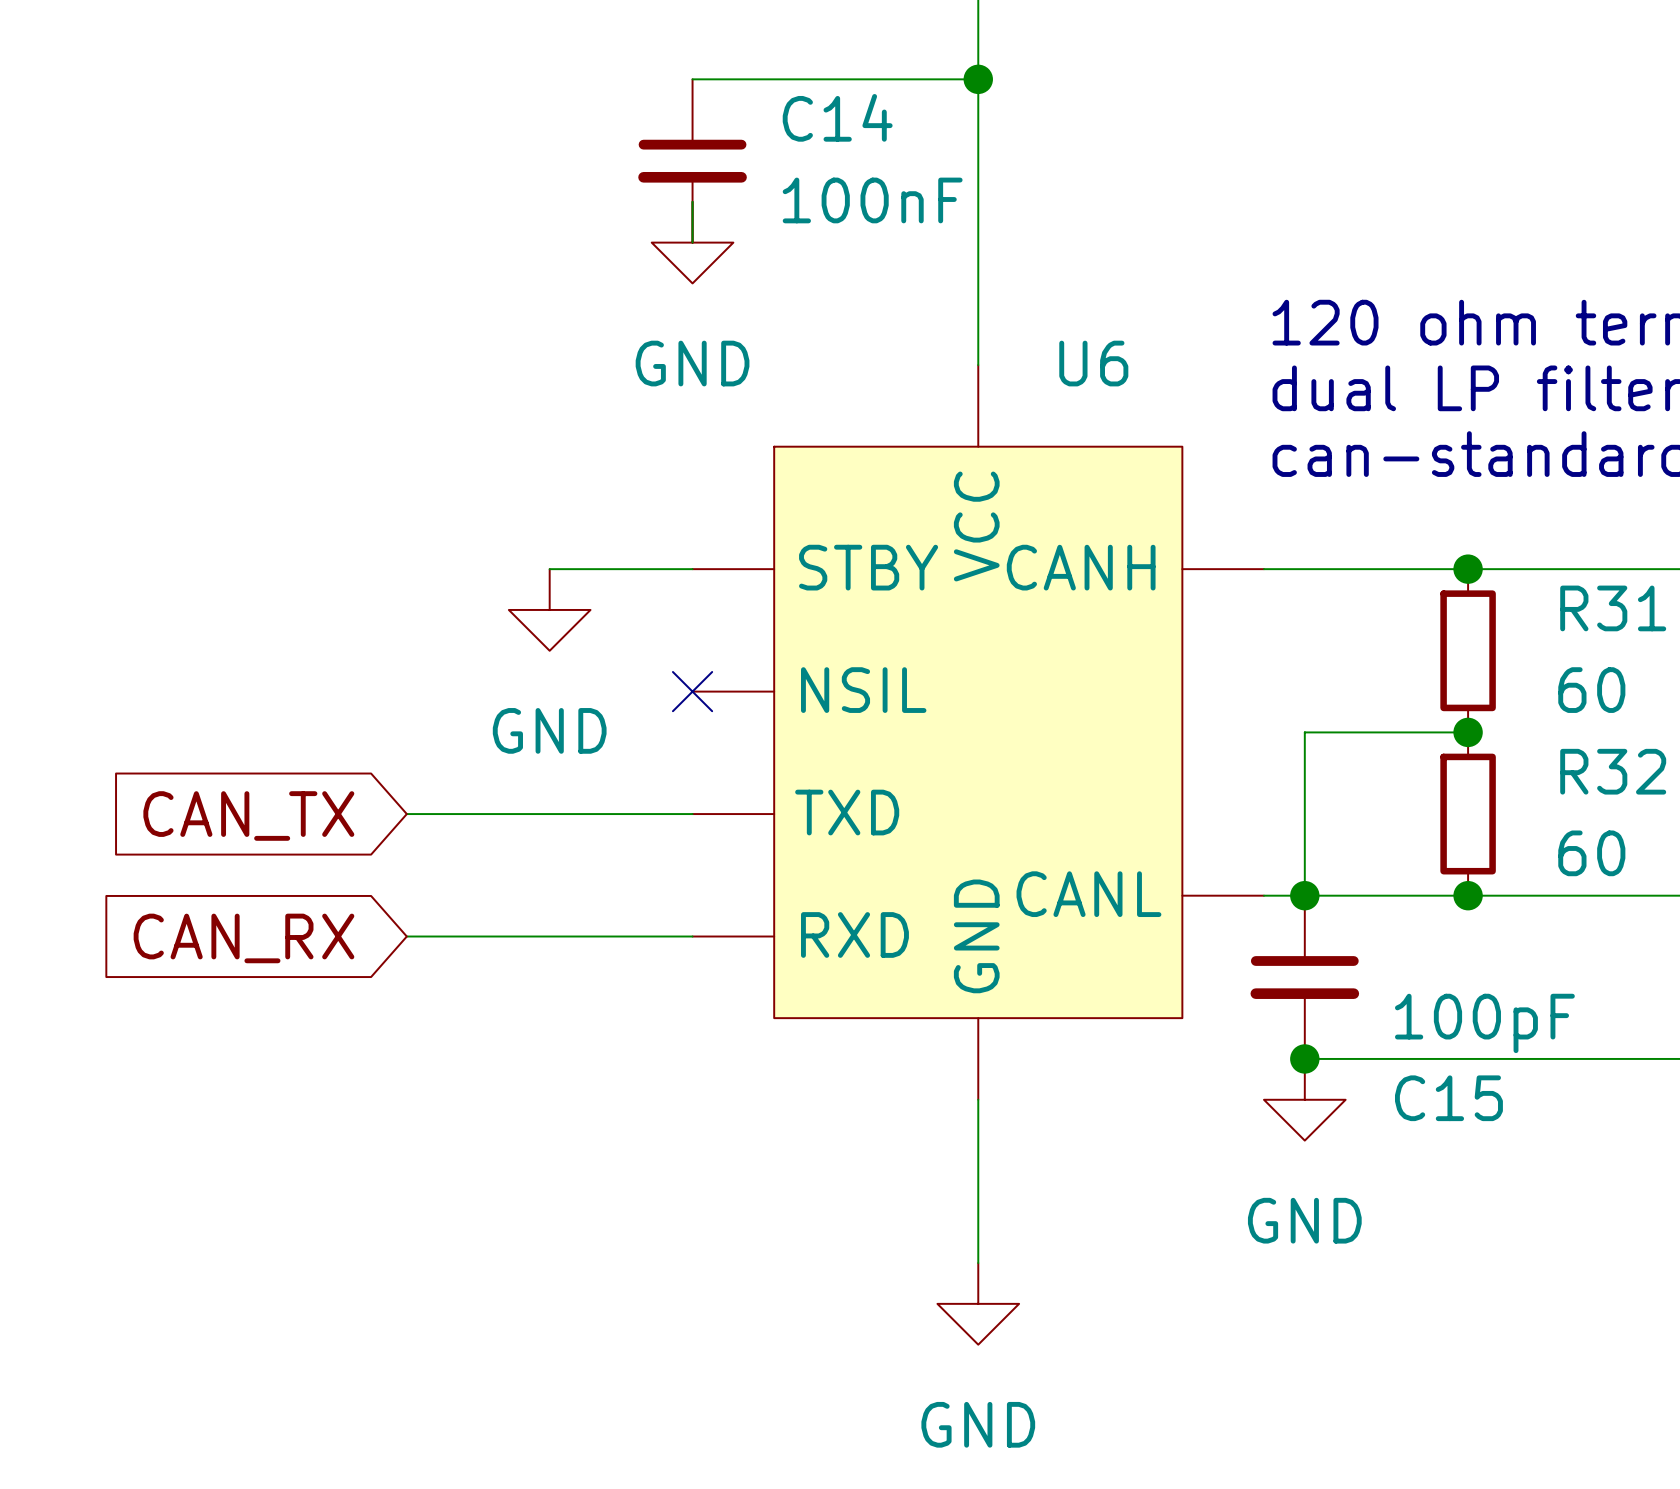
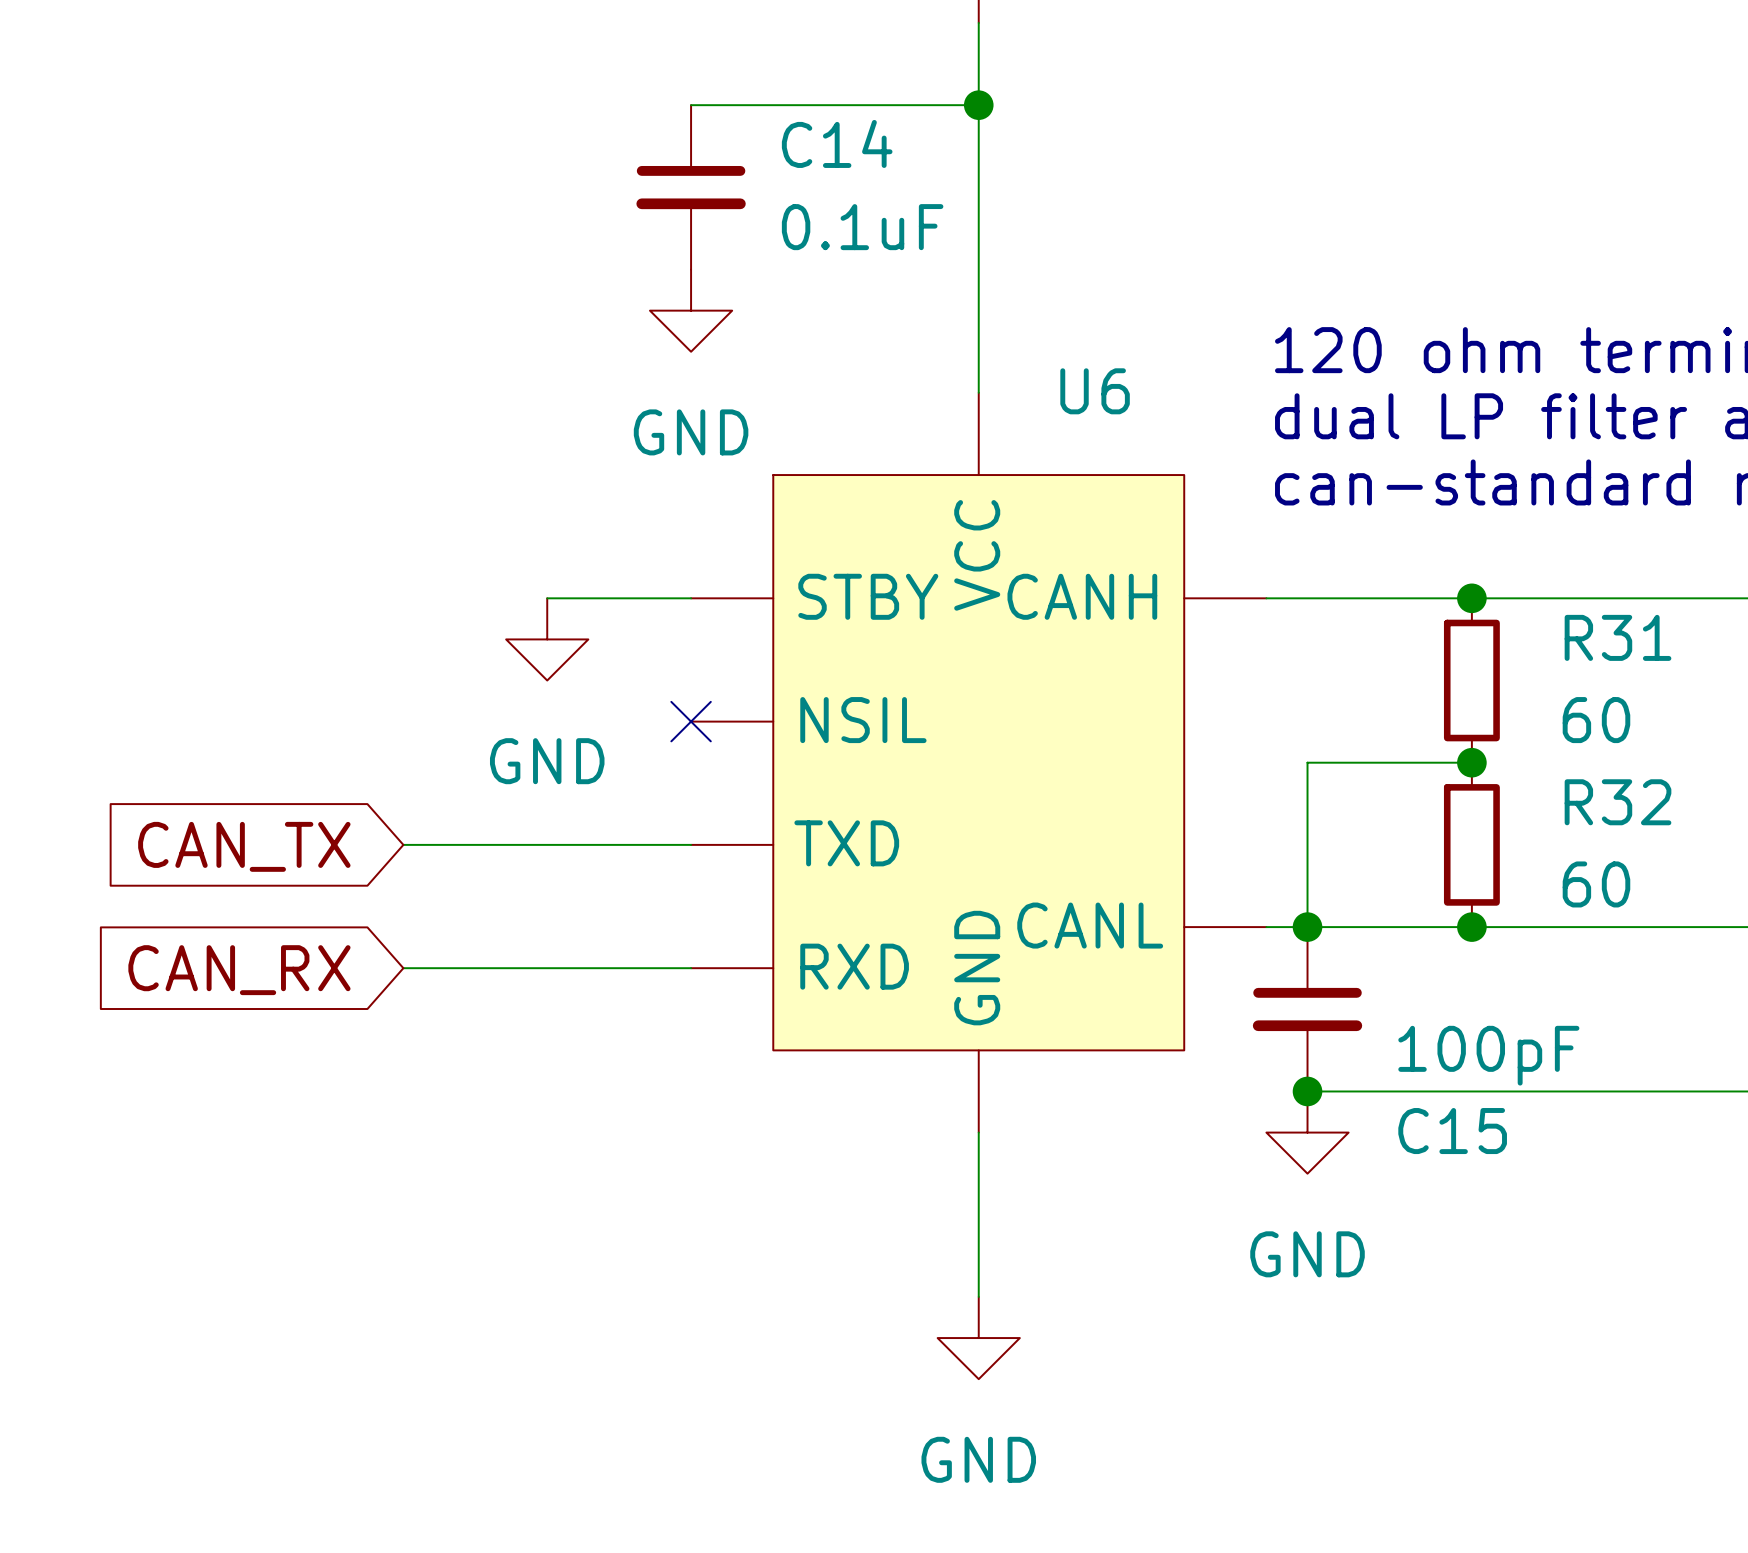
C14 value: 100nF (872, 200) -> 0.1uF (862, 227)
power symbol position: GND (692, 242) -> GND (691, 310)

